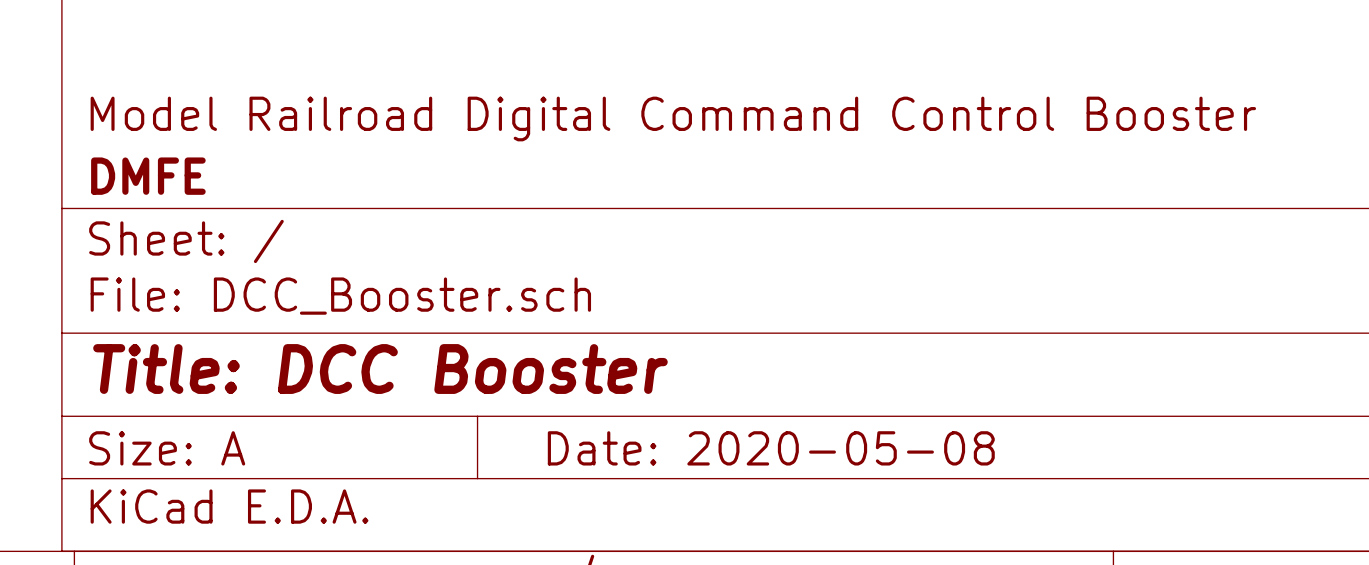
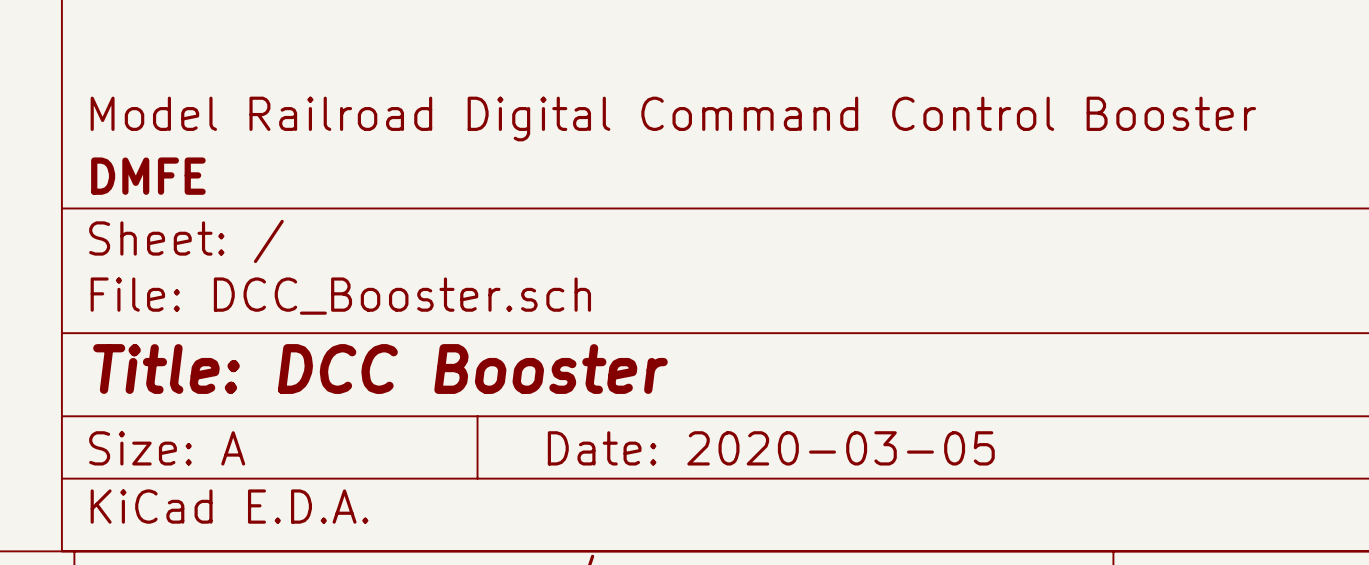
title block: Date: 2020-05-08 (771, 448) -> Date: 2020-03-05 (771, 448)

